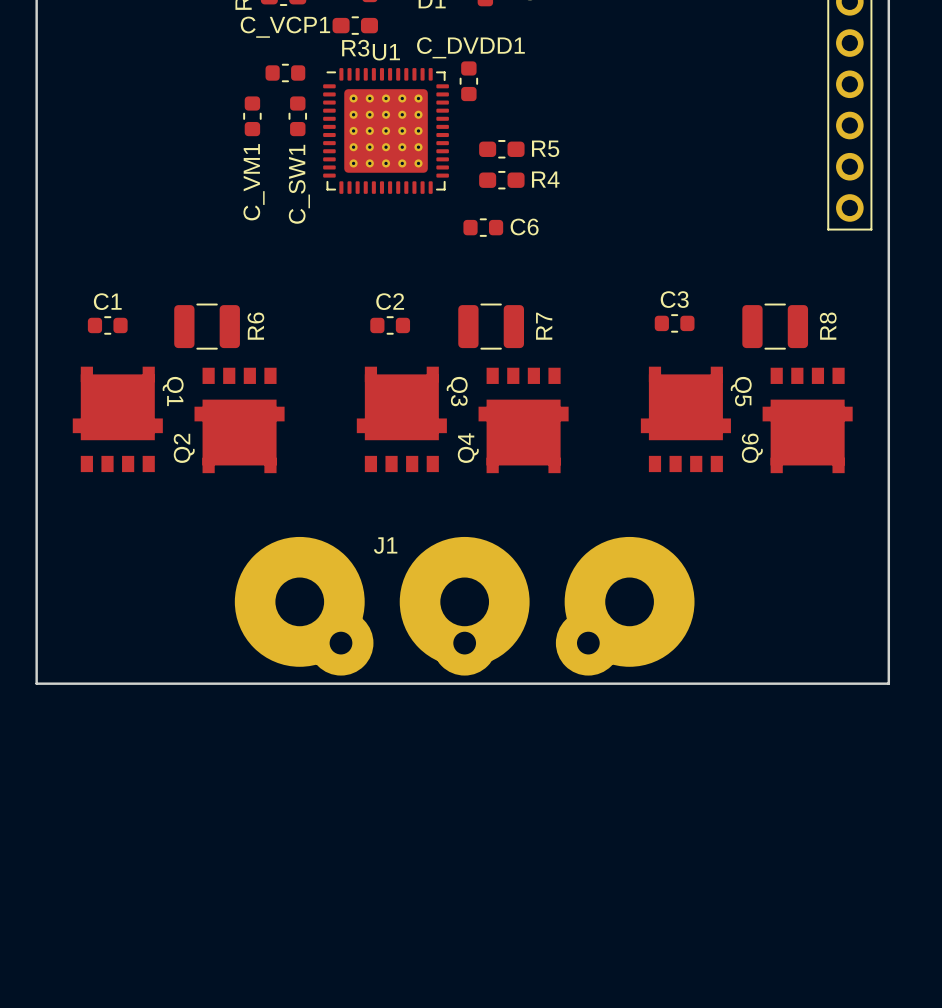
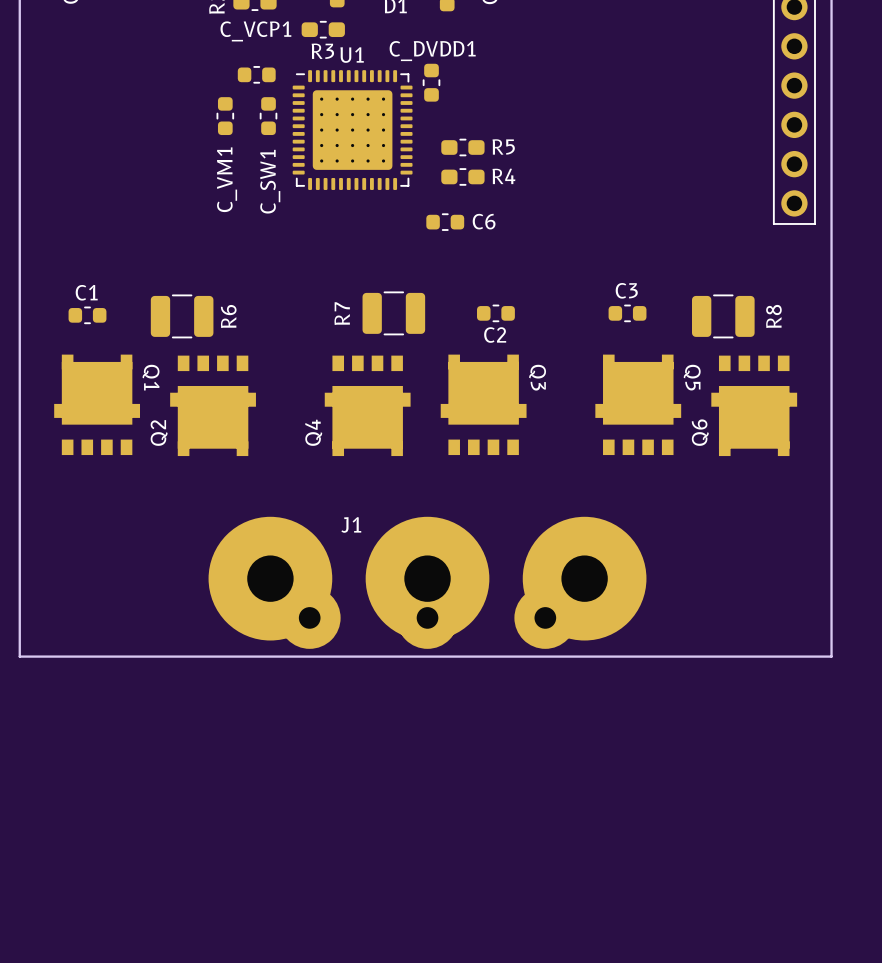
C2 name position: C2 (390, 301) -> C2 (495, 335)
C2 position: (390, 325) -> (495, 313)
R7 position: (491, 326) -> (393, 313)
R7 name position: R7 (544, 326) -> R7 (342, 313)
Q3 position: (401, 419) -> (483, 404)
Q4 position: (523, 420) -> (367, 405)

